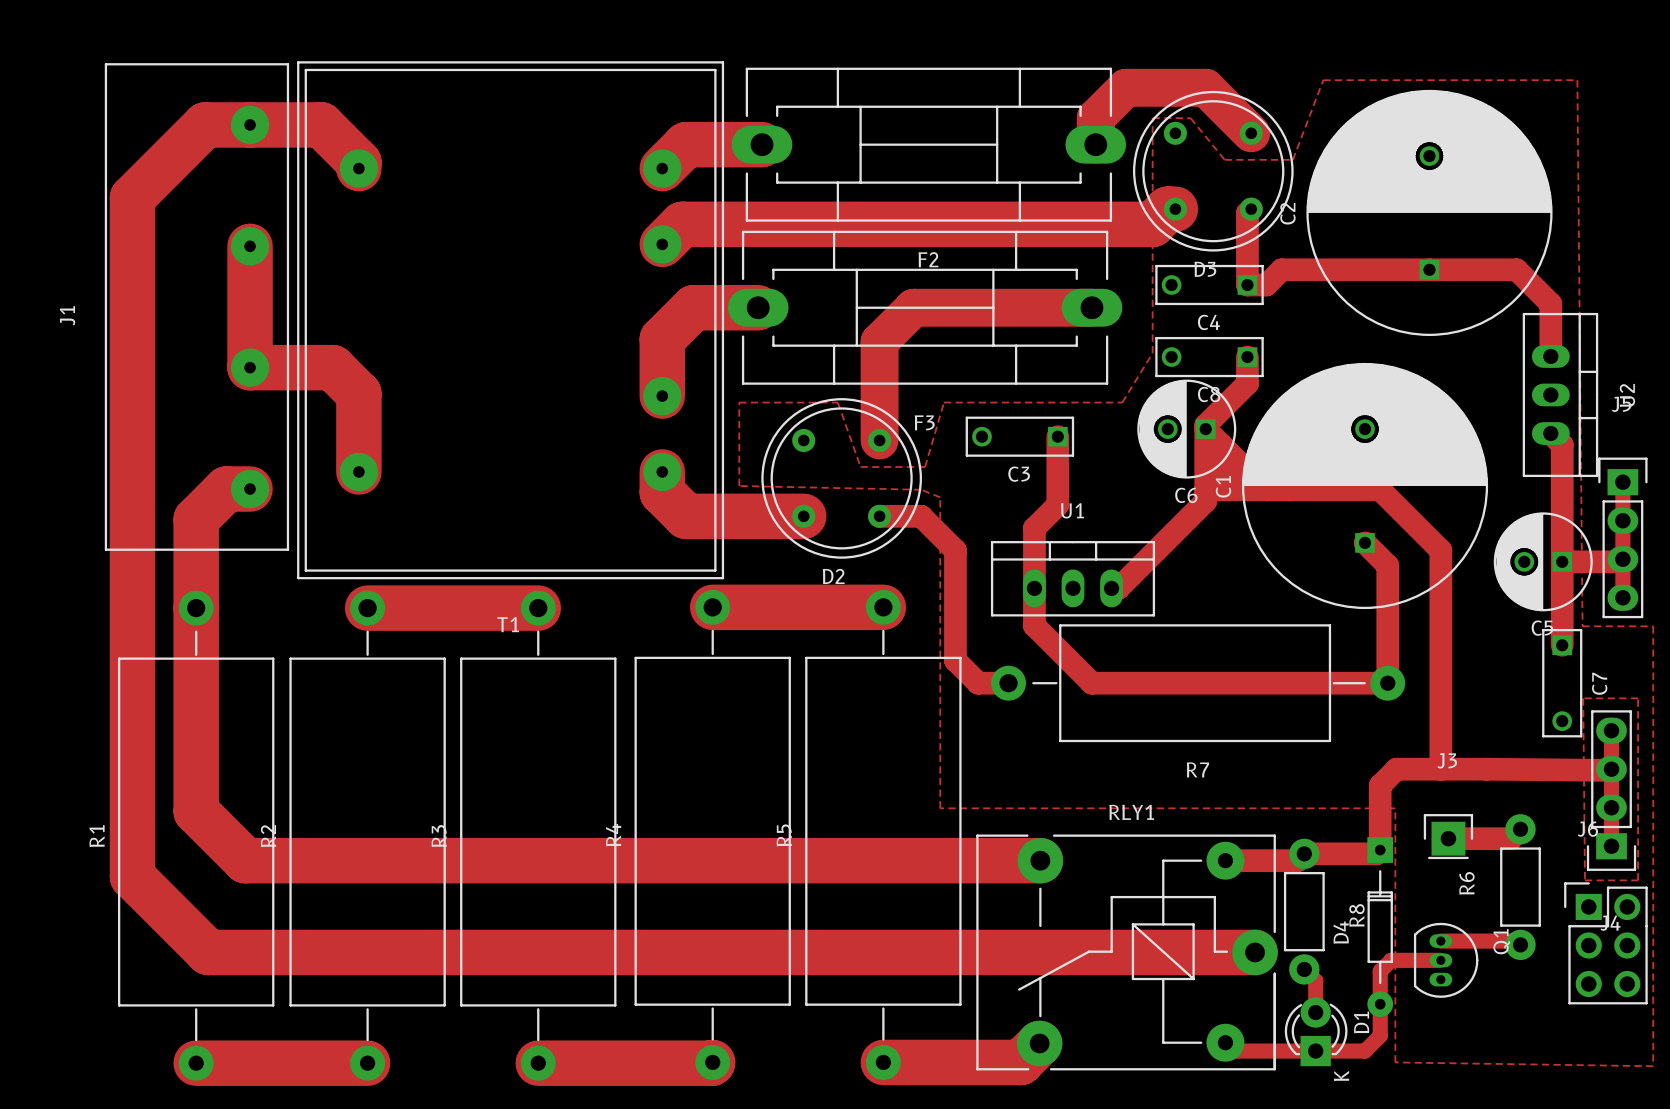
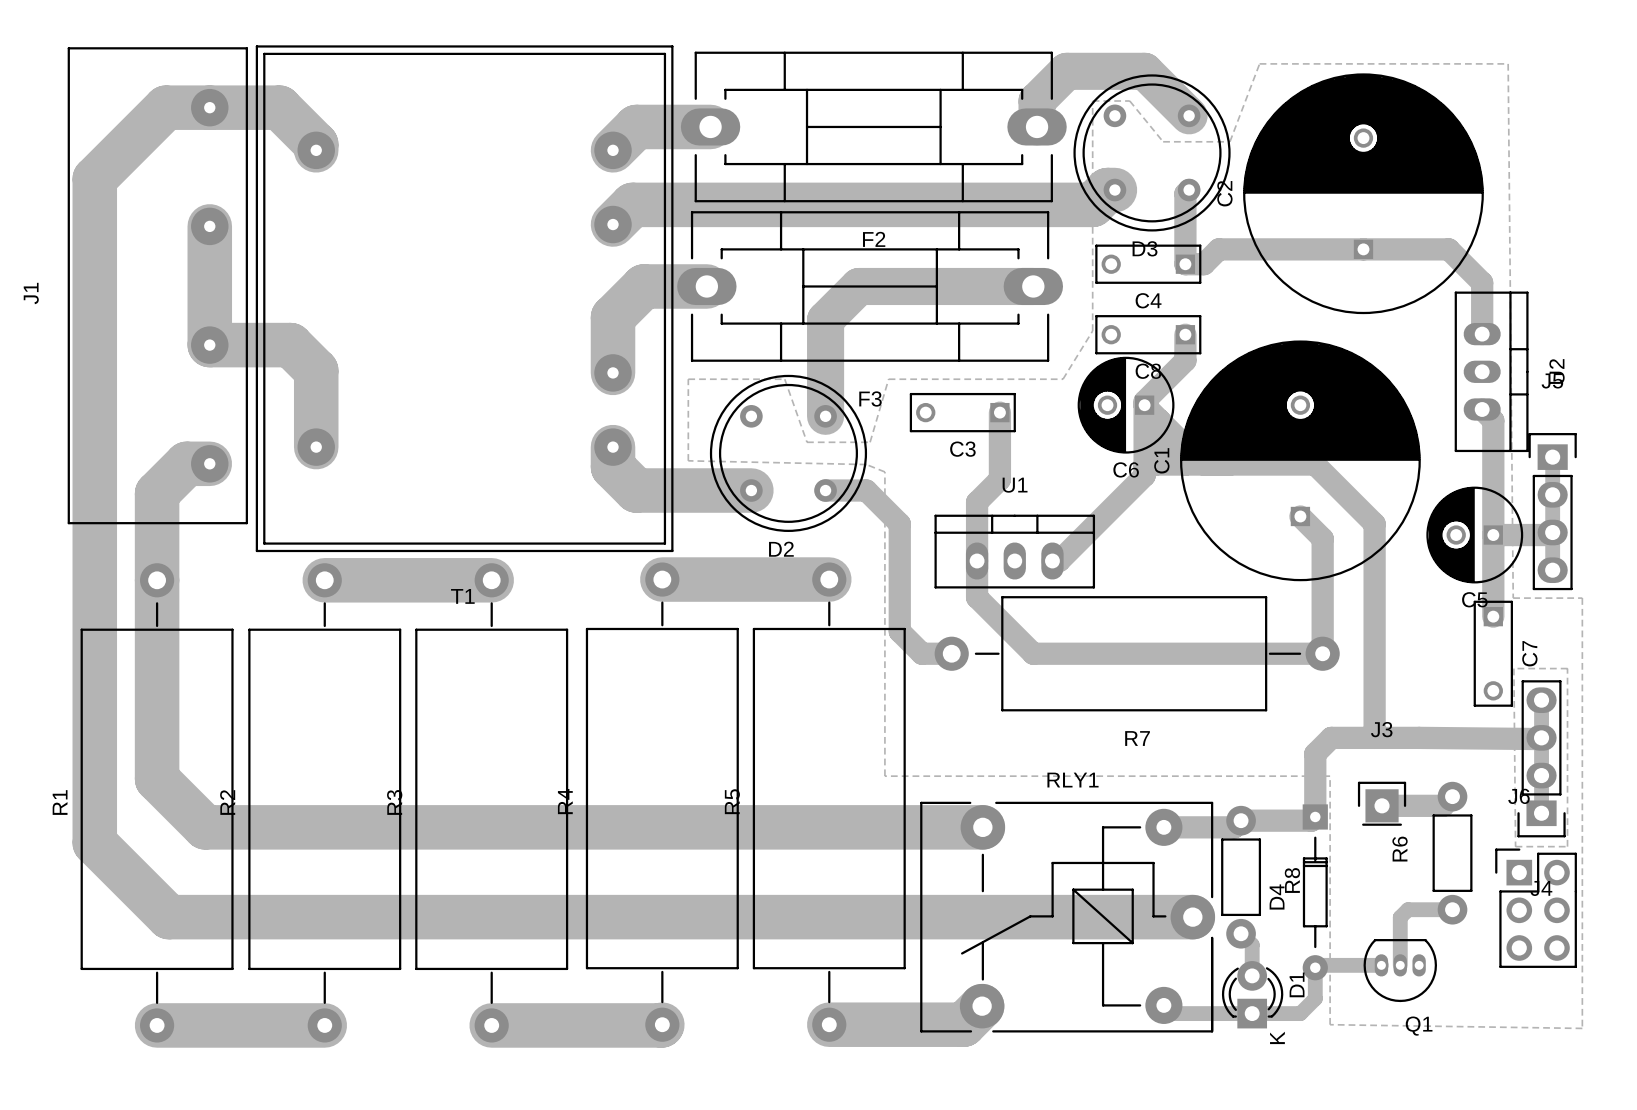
track: (1440, 941) (1516, 941) -> none
track: none -> (1452, 909) (1407, 909) (1400, 917) (1400, 965)
track: (1440, 960) (1391, 960) (1380, 971) (1380, 1004) -> (1381, 965) (1317, 965) (1315, 967)
Q1 rotation: 0° (1446, 960) -> 90° clockwise (1400, 970)
Q1 position: (1446, 960) -> (1400, 970)

